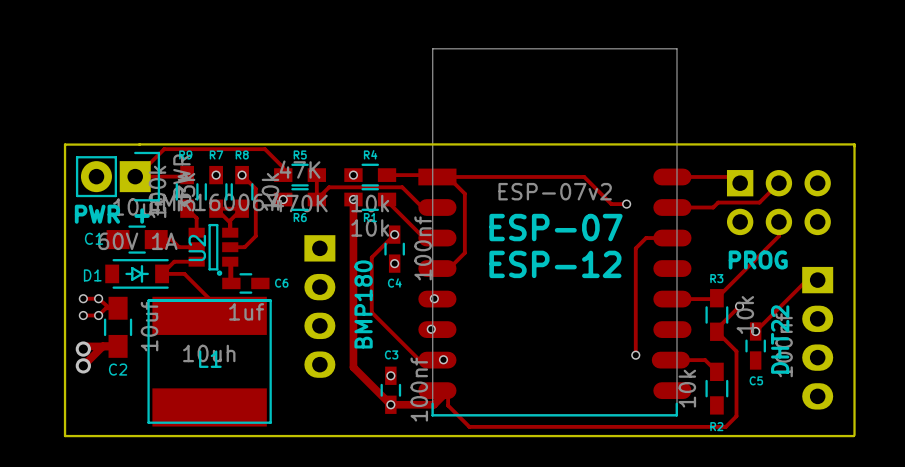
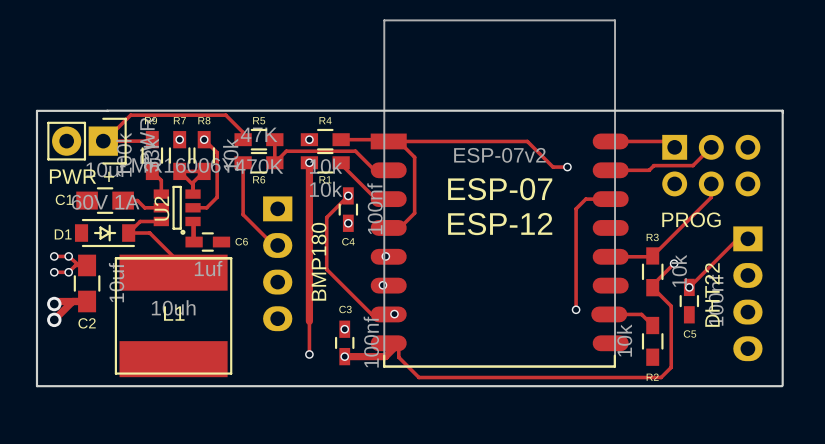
track: none -> (243, 162) (243, 214) (273, 245)
via: (283, 199) -> none
track: (353, 367) (390, 404) -> (309, 321) (309, 354)
via: none -> (309, 354)

